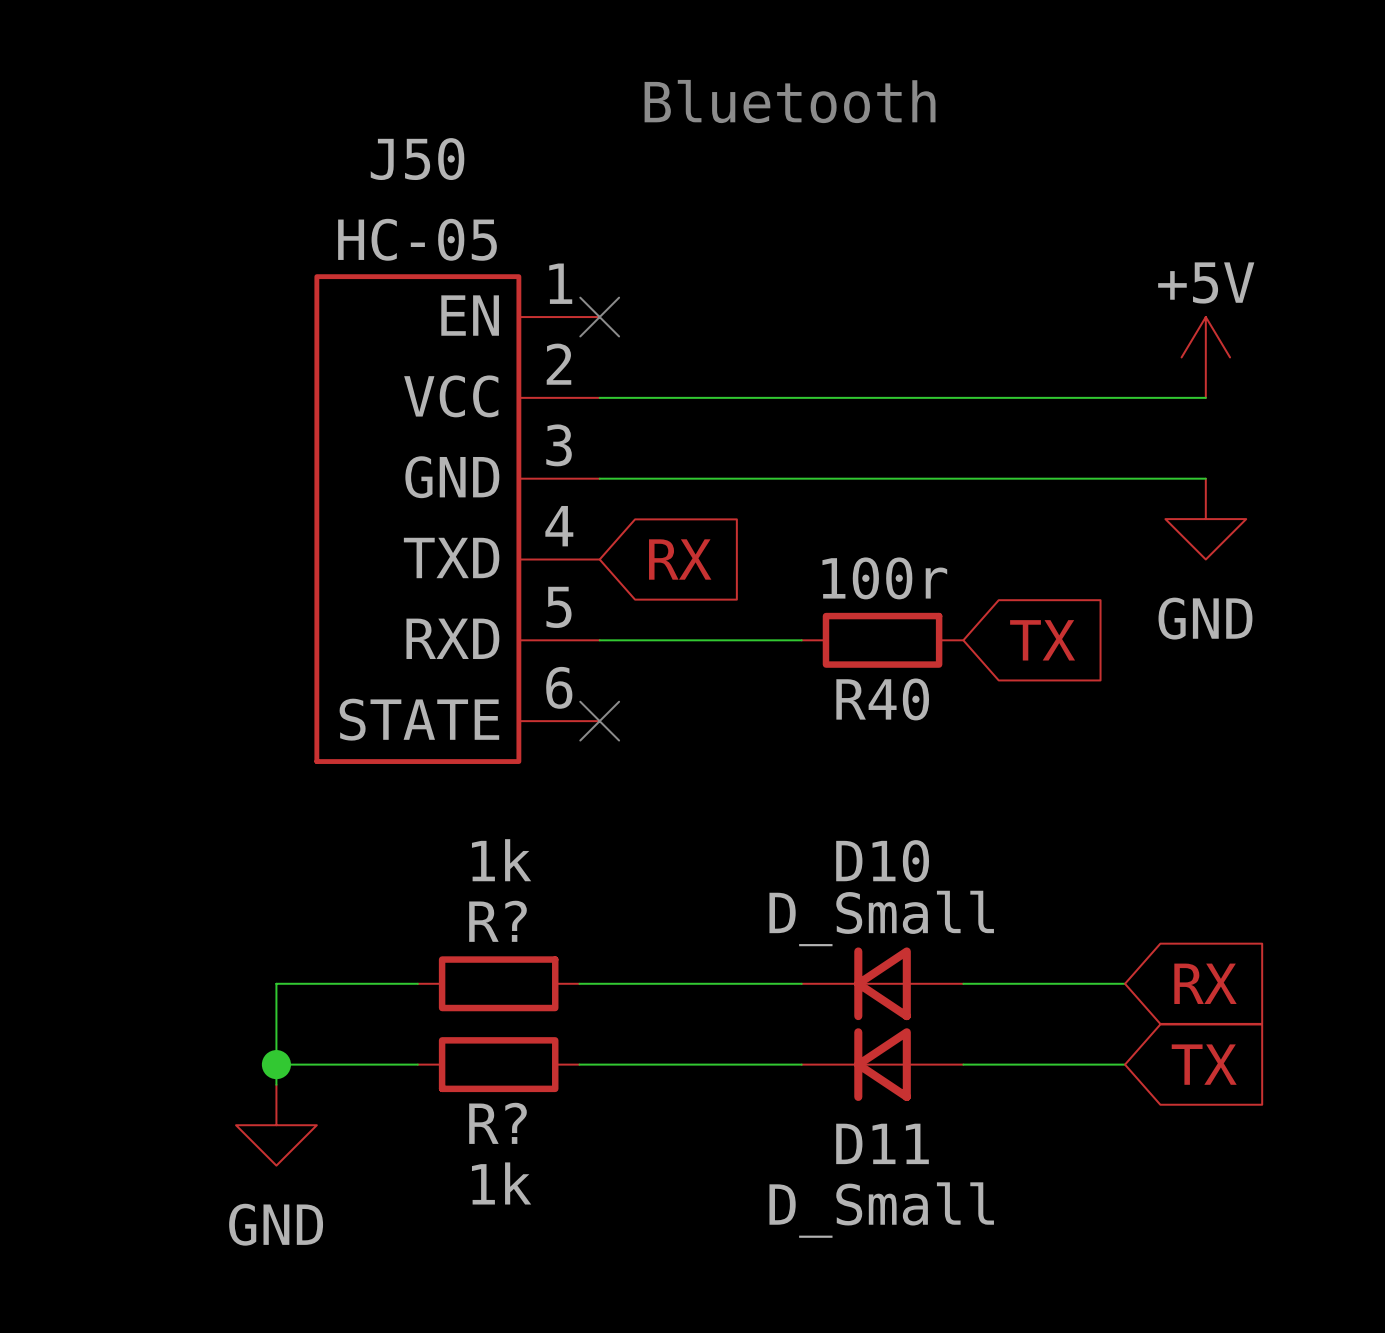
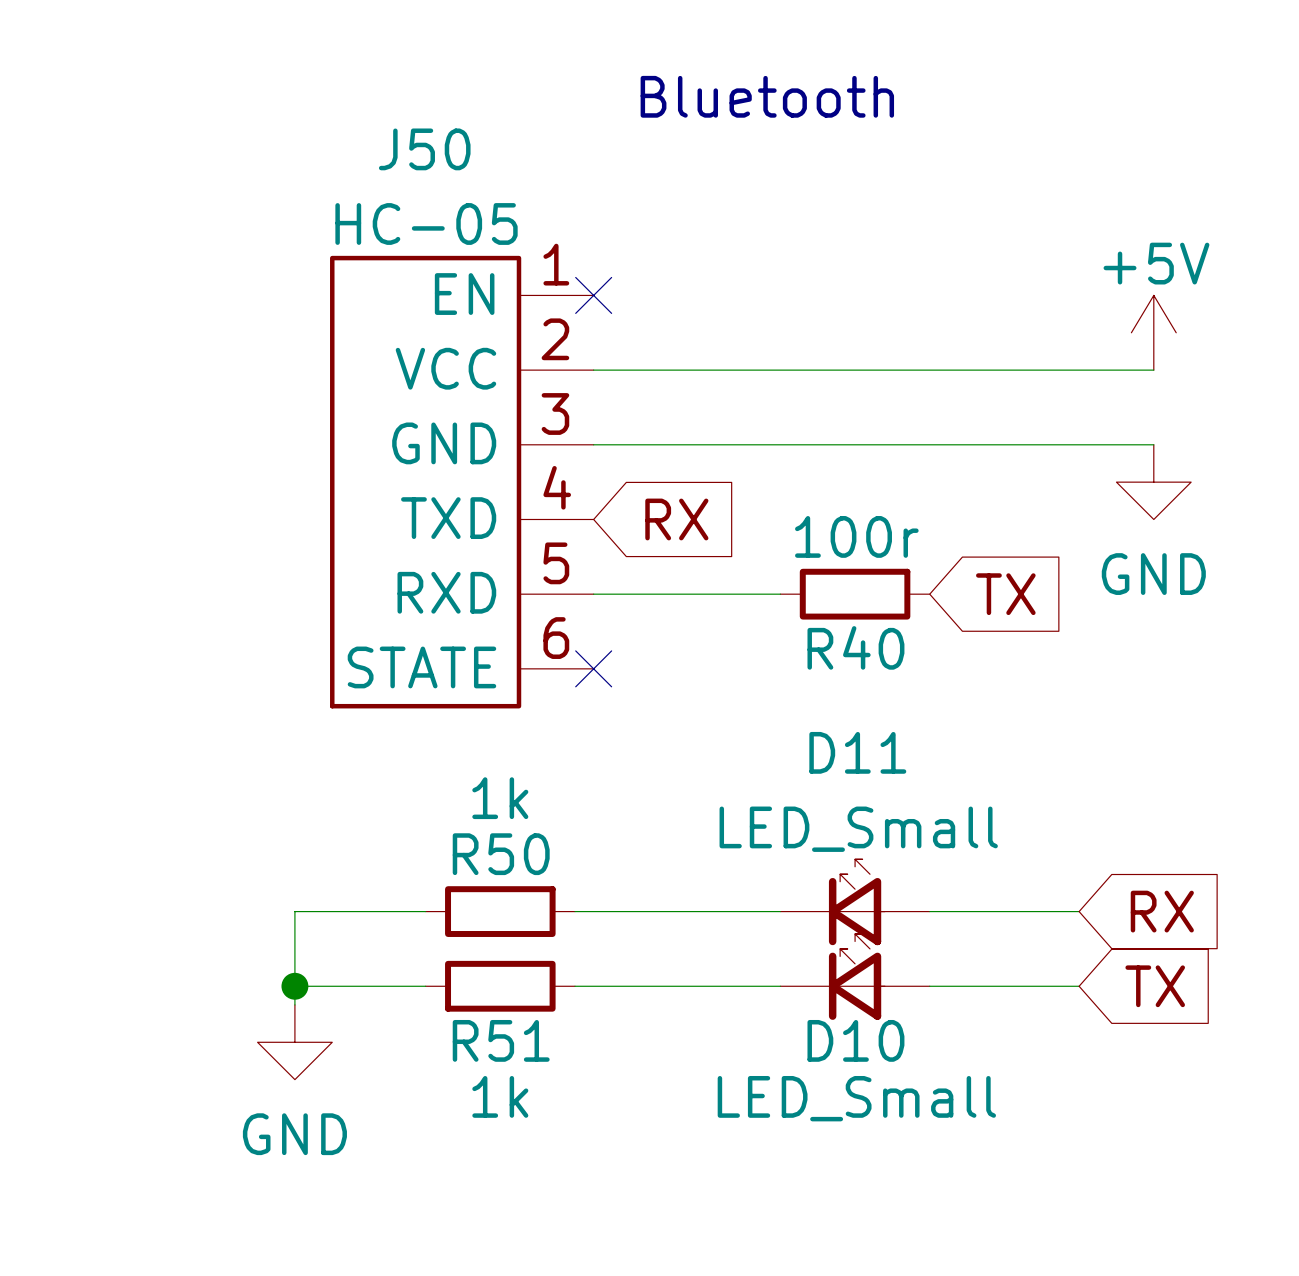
D10 name position: D10 (882, 861) -> D10 (855, 1040)
D10 value: D_Small (881, 918) -> LED_Small (856, 1098)
R? name: R? (498, 921) -> R50 (501, 854)
D10 symbol: [801, 947, 964, 1021] -> [780, 933, 930, 1020]
D11 symbol: [801, 1028, 964, 1101] -> [780, 859, 930, 946]
R? name: R? (498, 1123) -> R51 (501, 1040)
D11 name position: D11 (882, 1143) -> D11 (857, 752)
D11 value: D_Small (881, 1210) -> LED_Small (858, 829)

